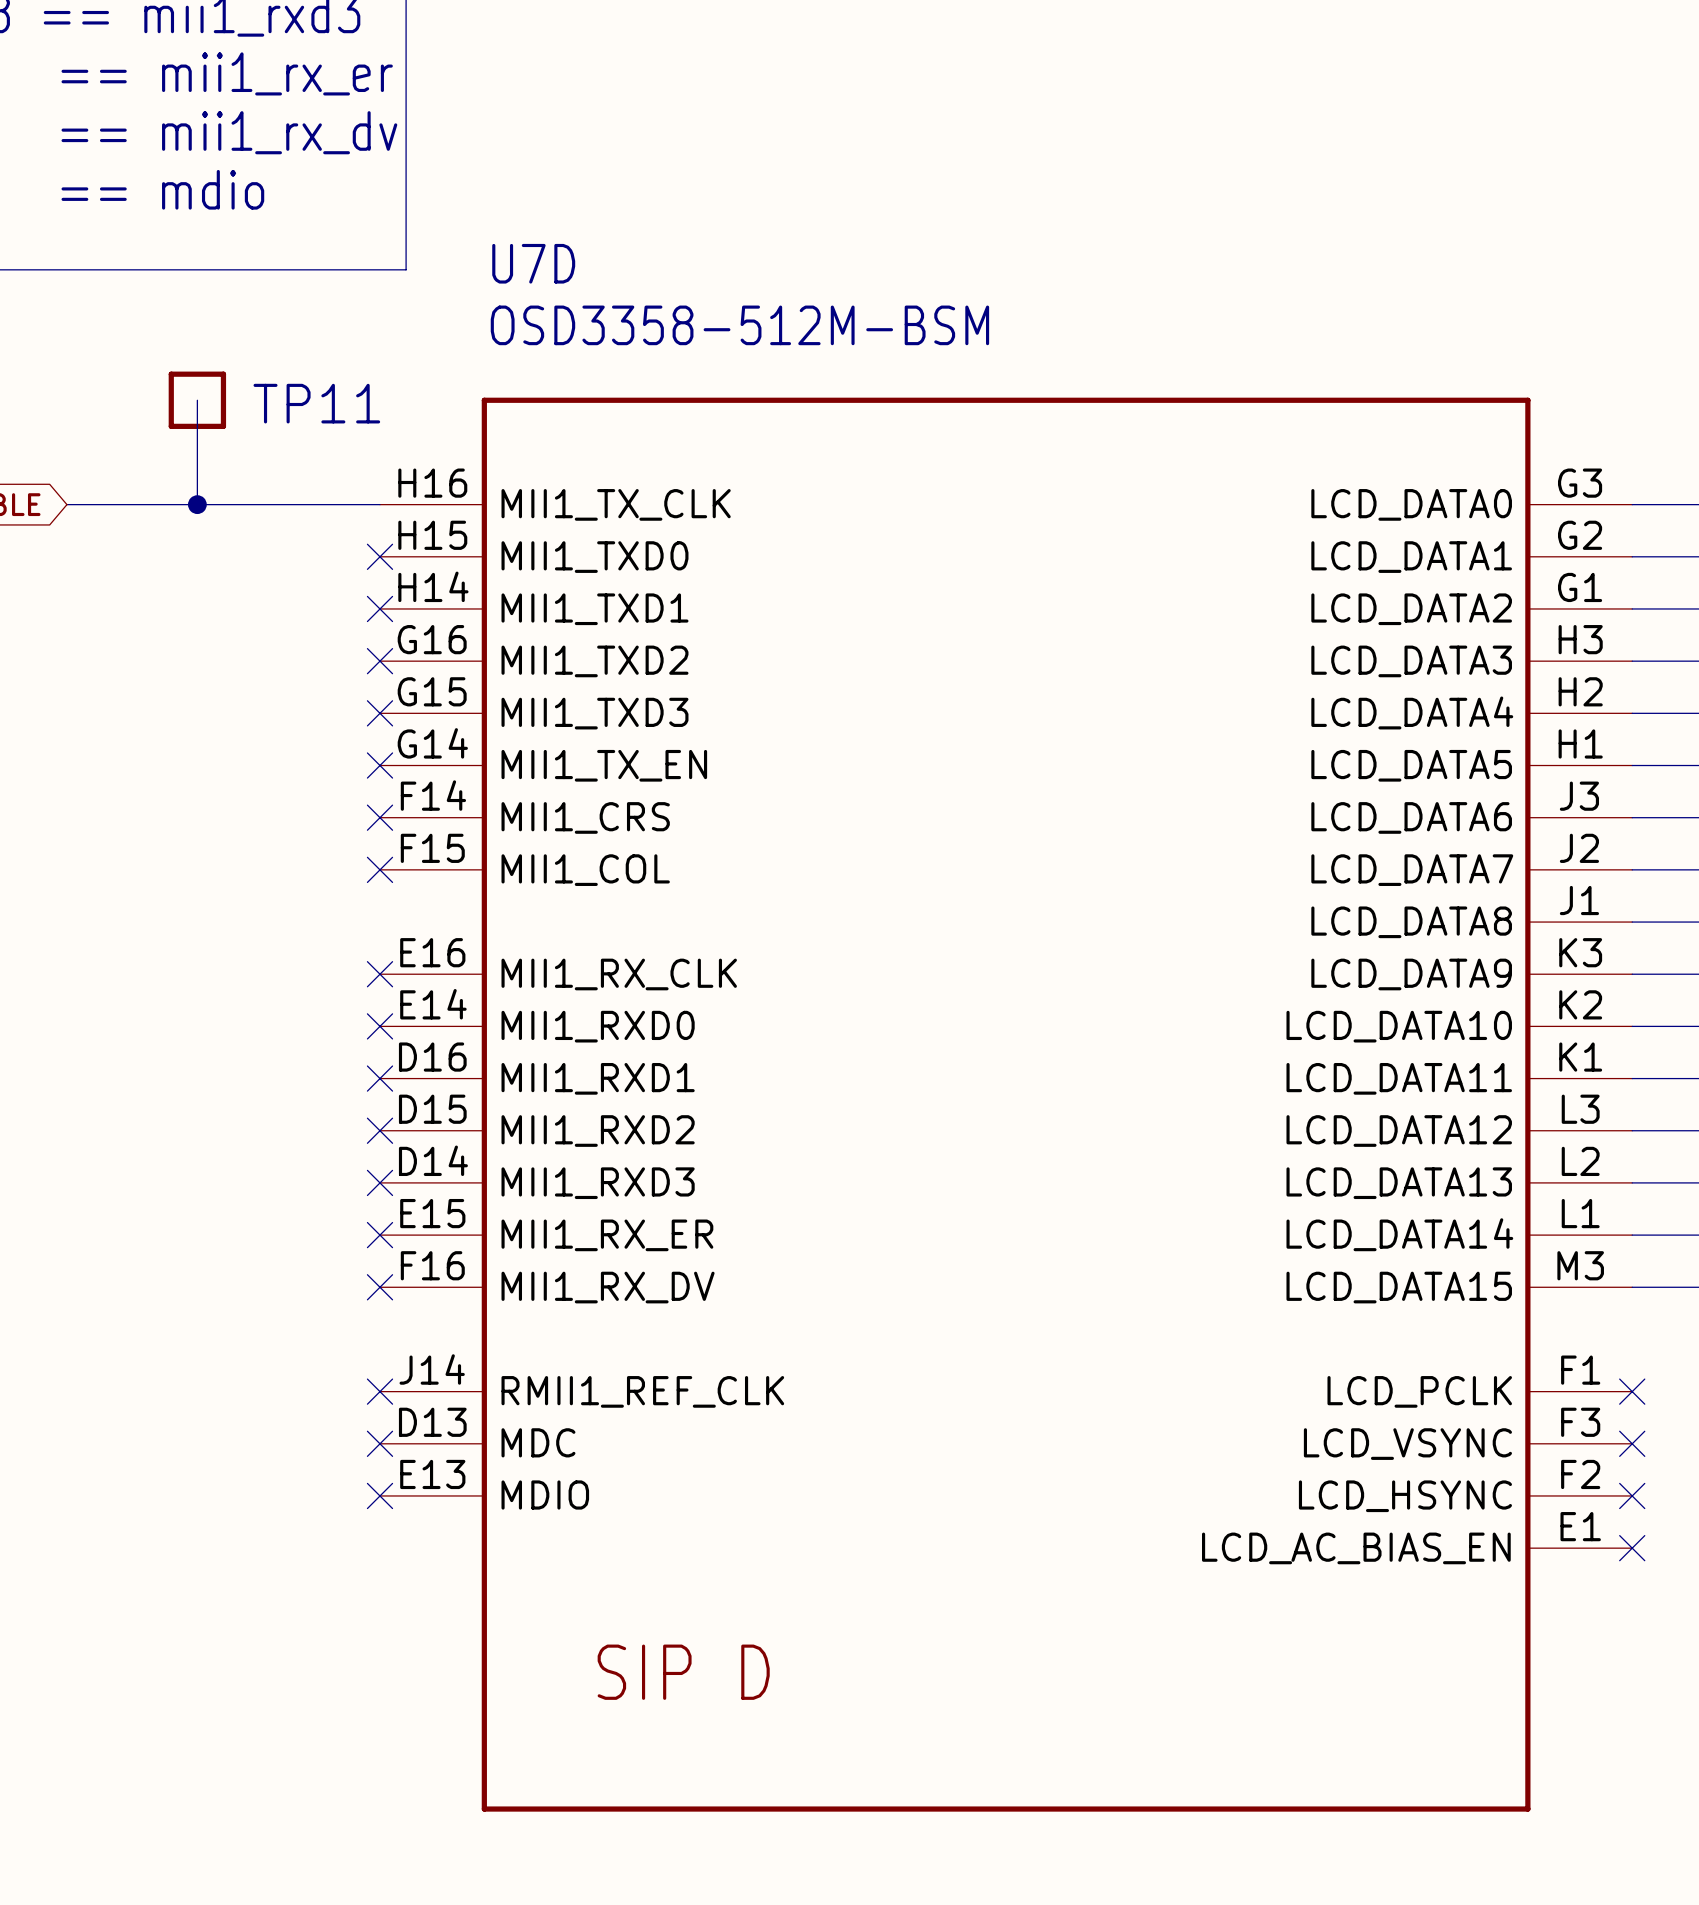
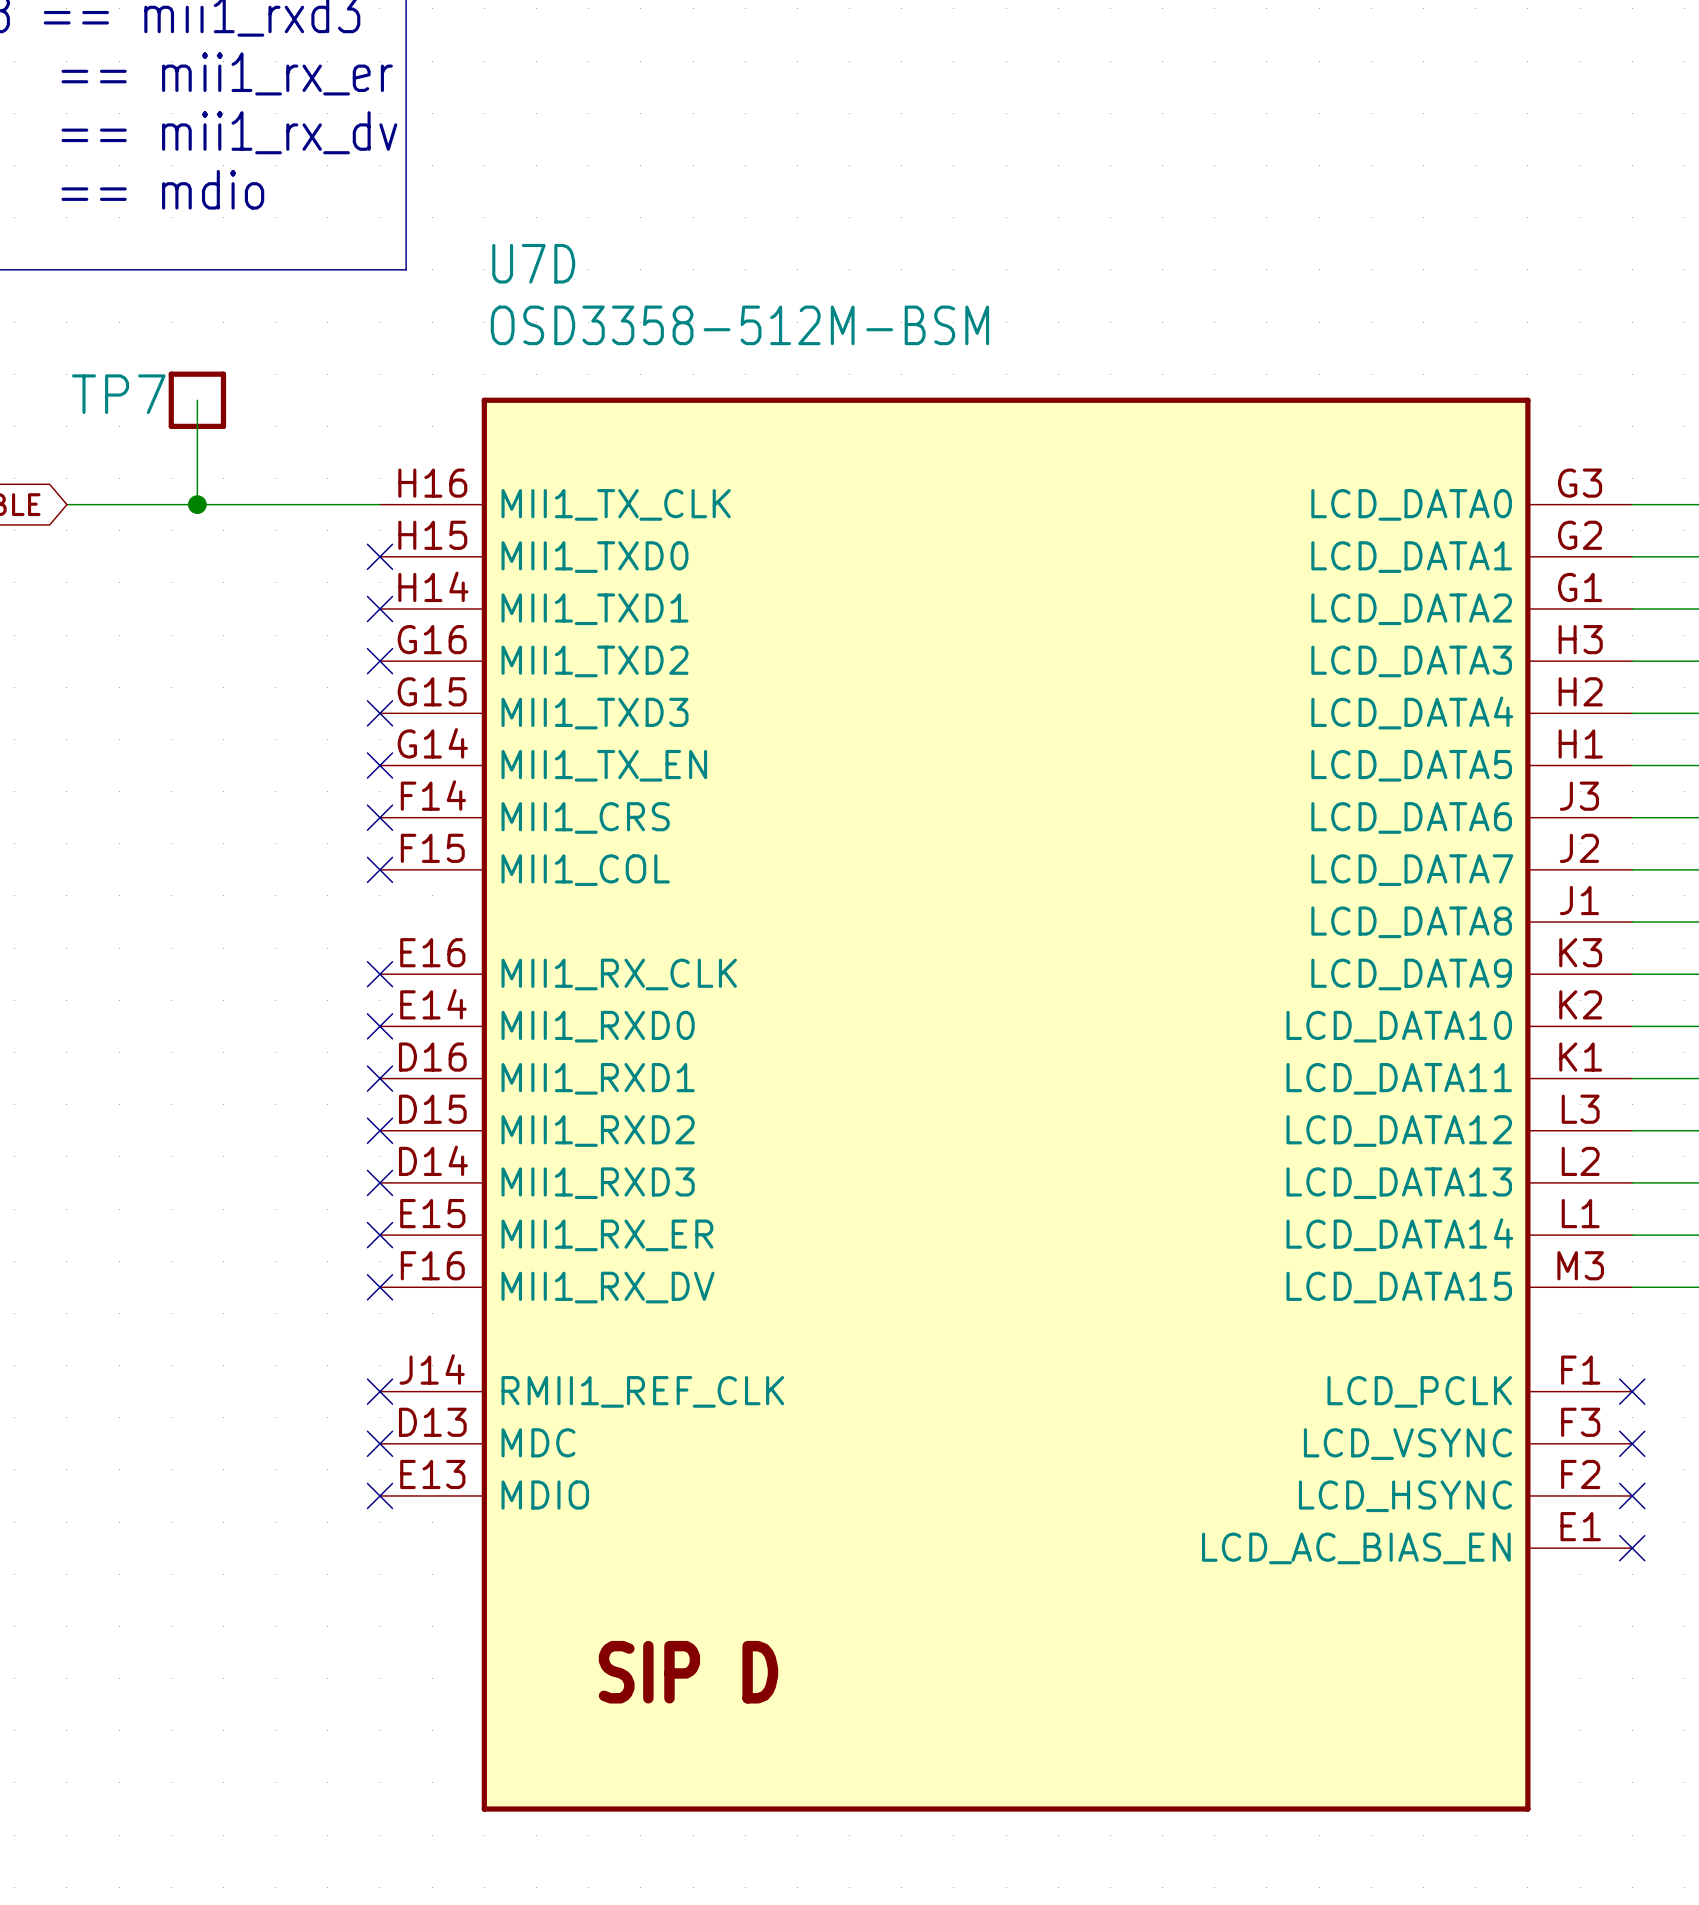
U7D symbol: [379, 397, 1633, 1812] -> [379, 397, 1633, 1812]
TP11 name: TP11 (316, 403) -> TP7 (118, 394)

